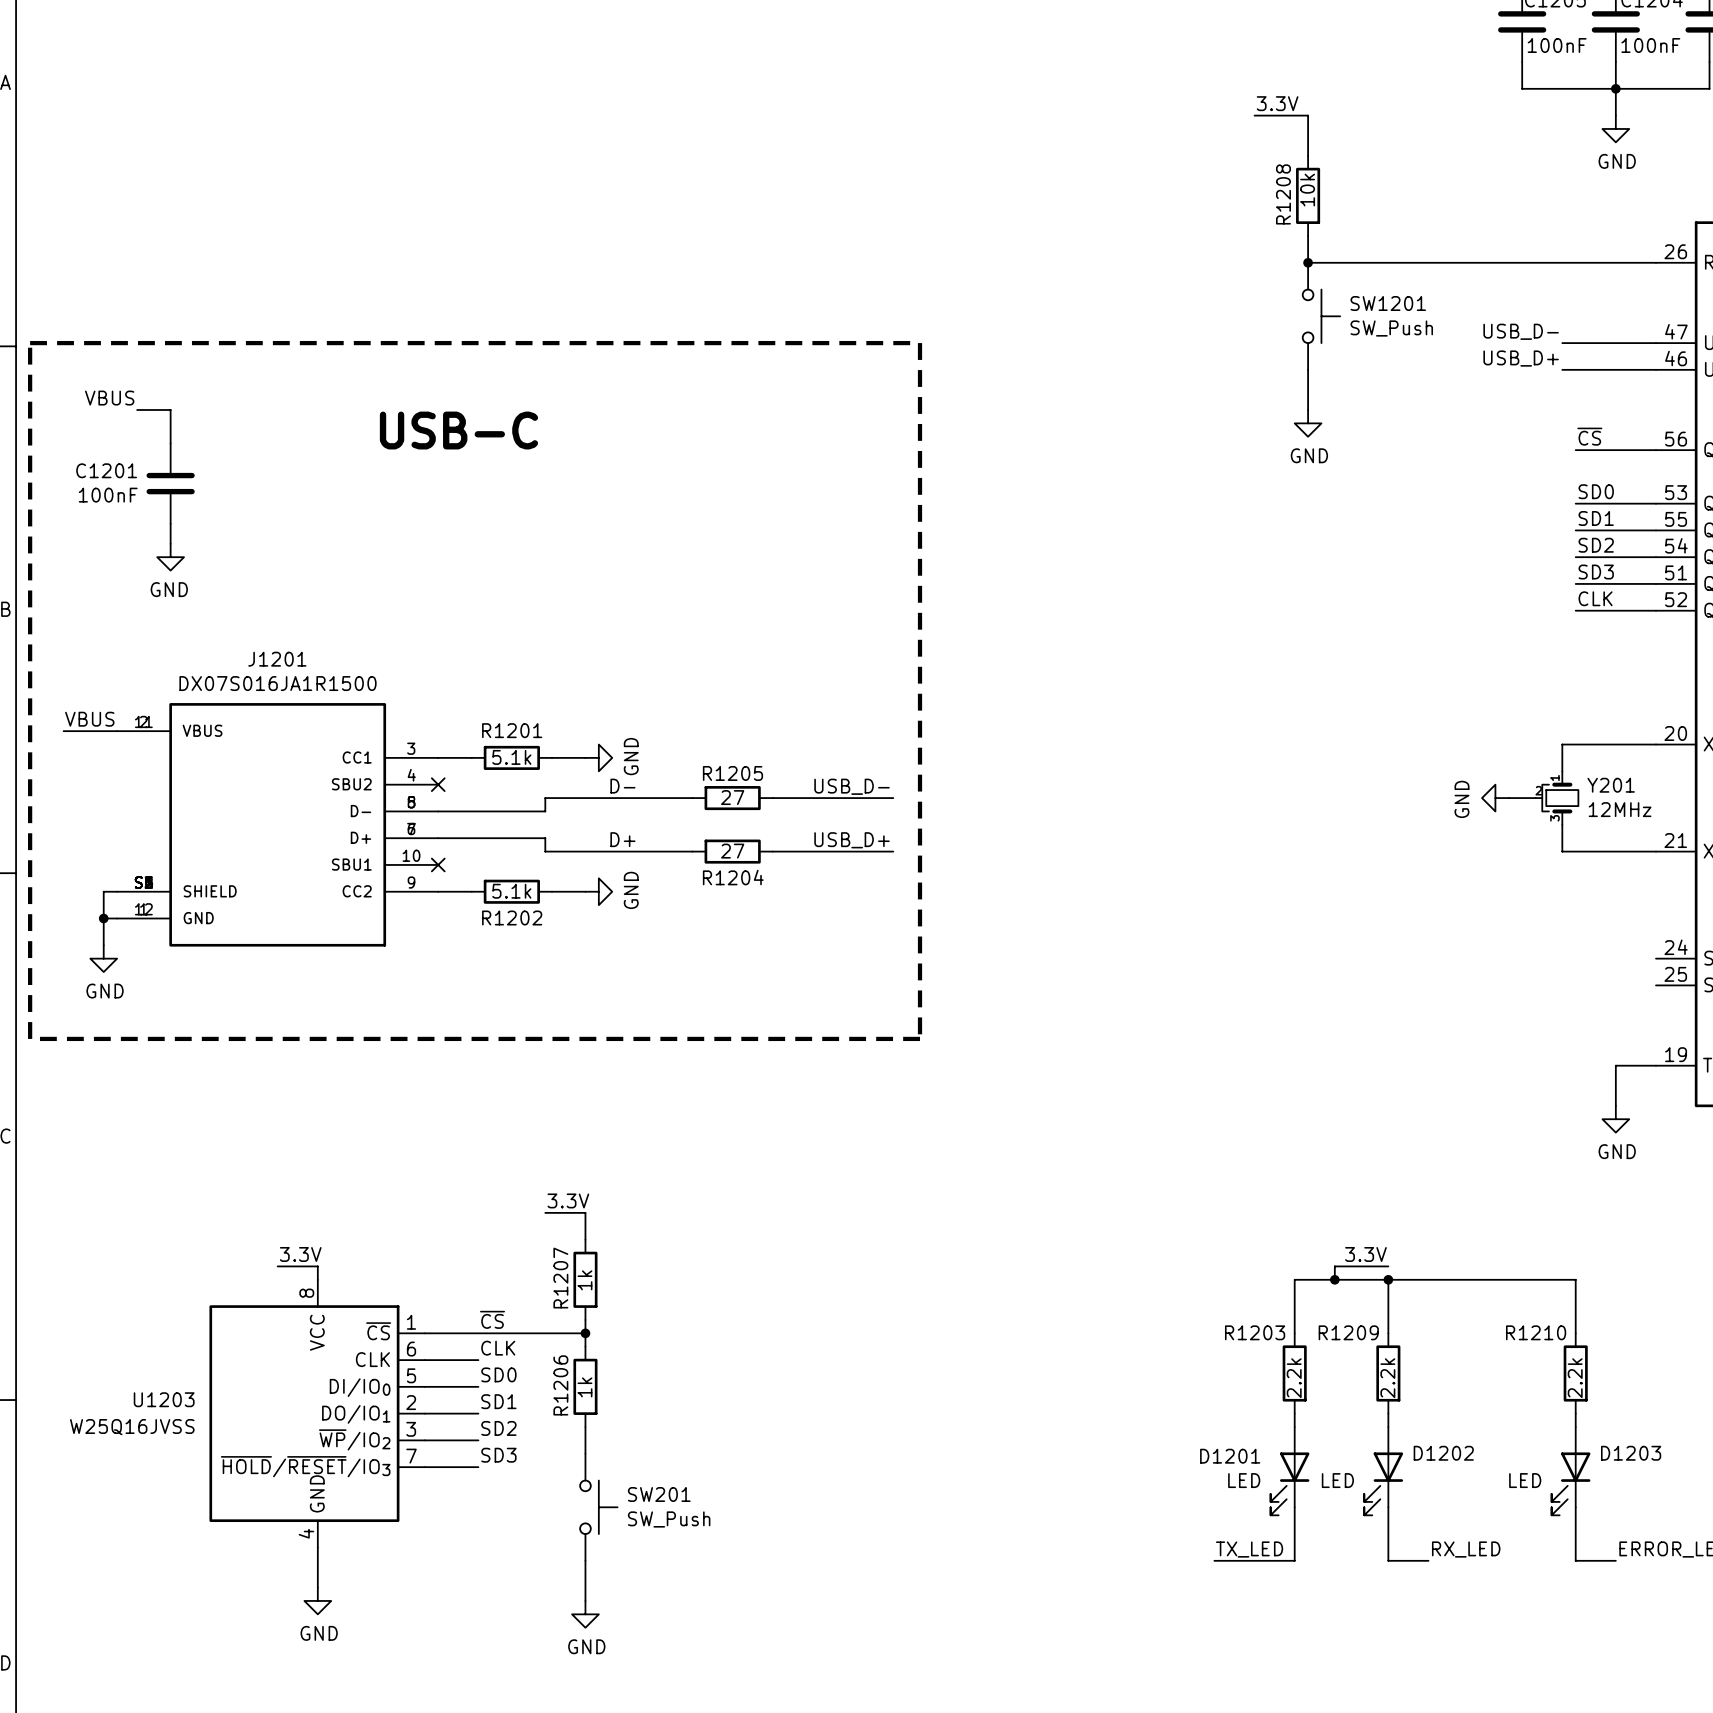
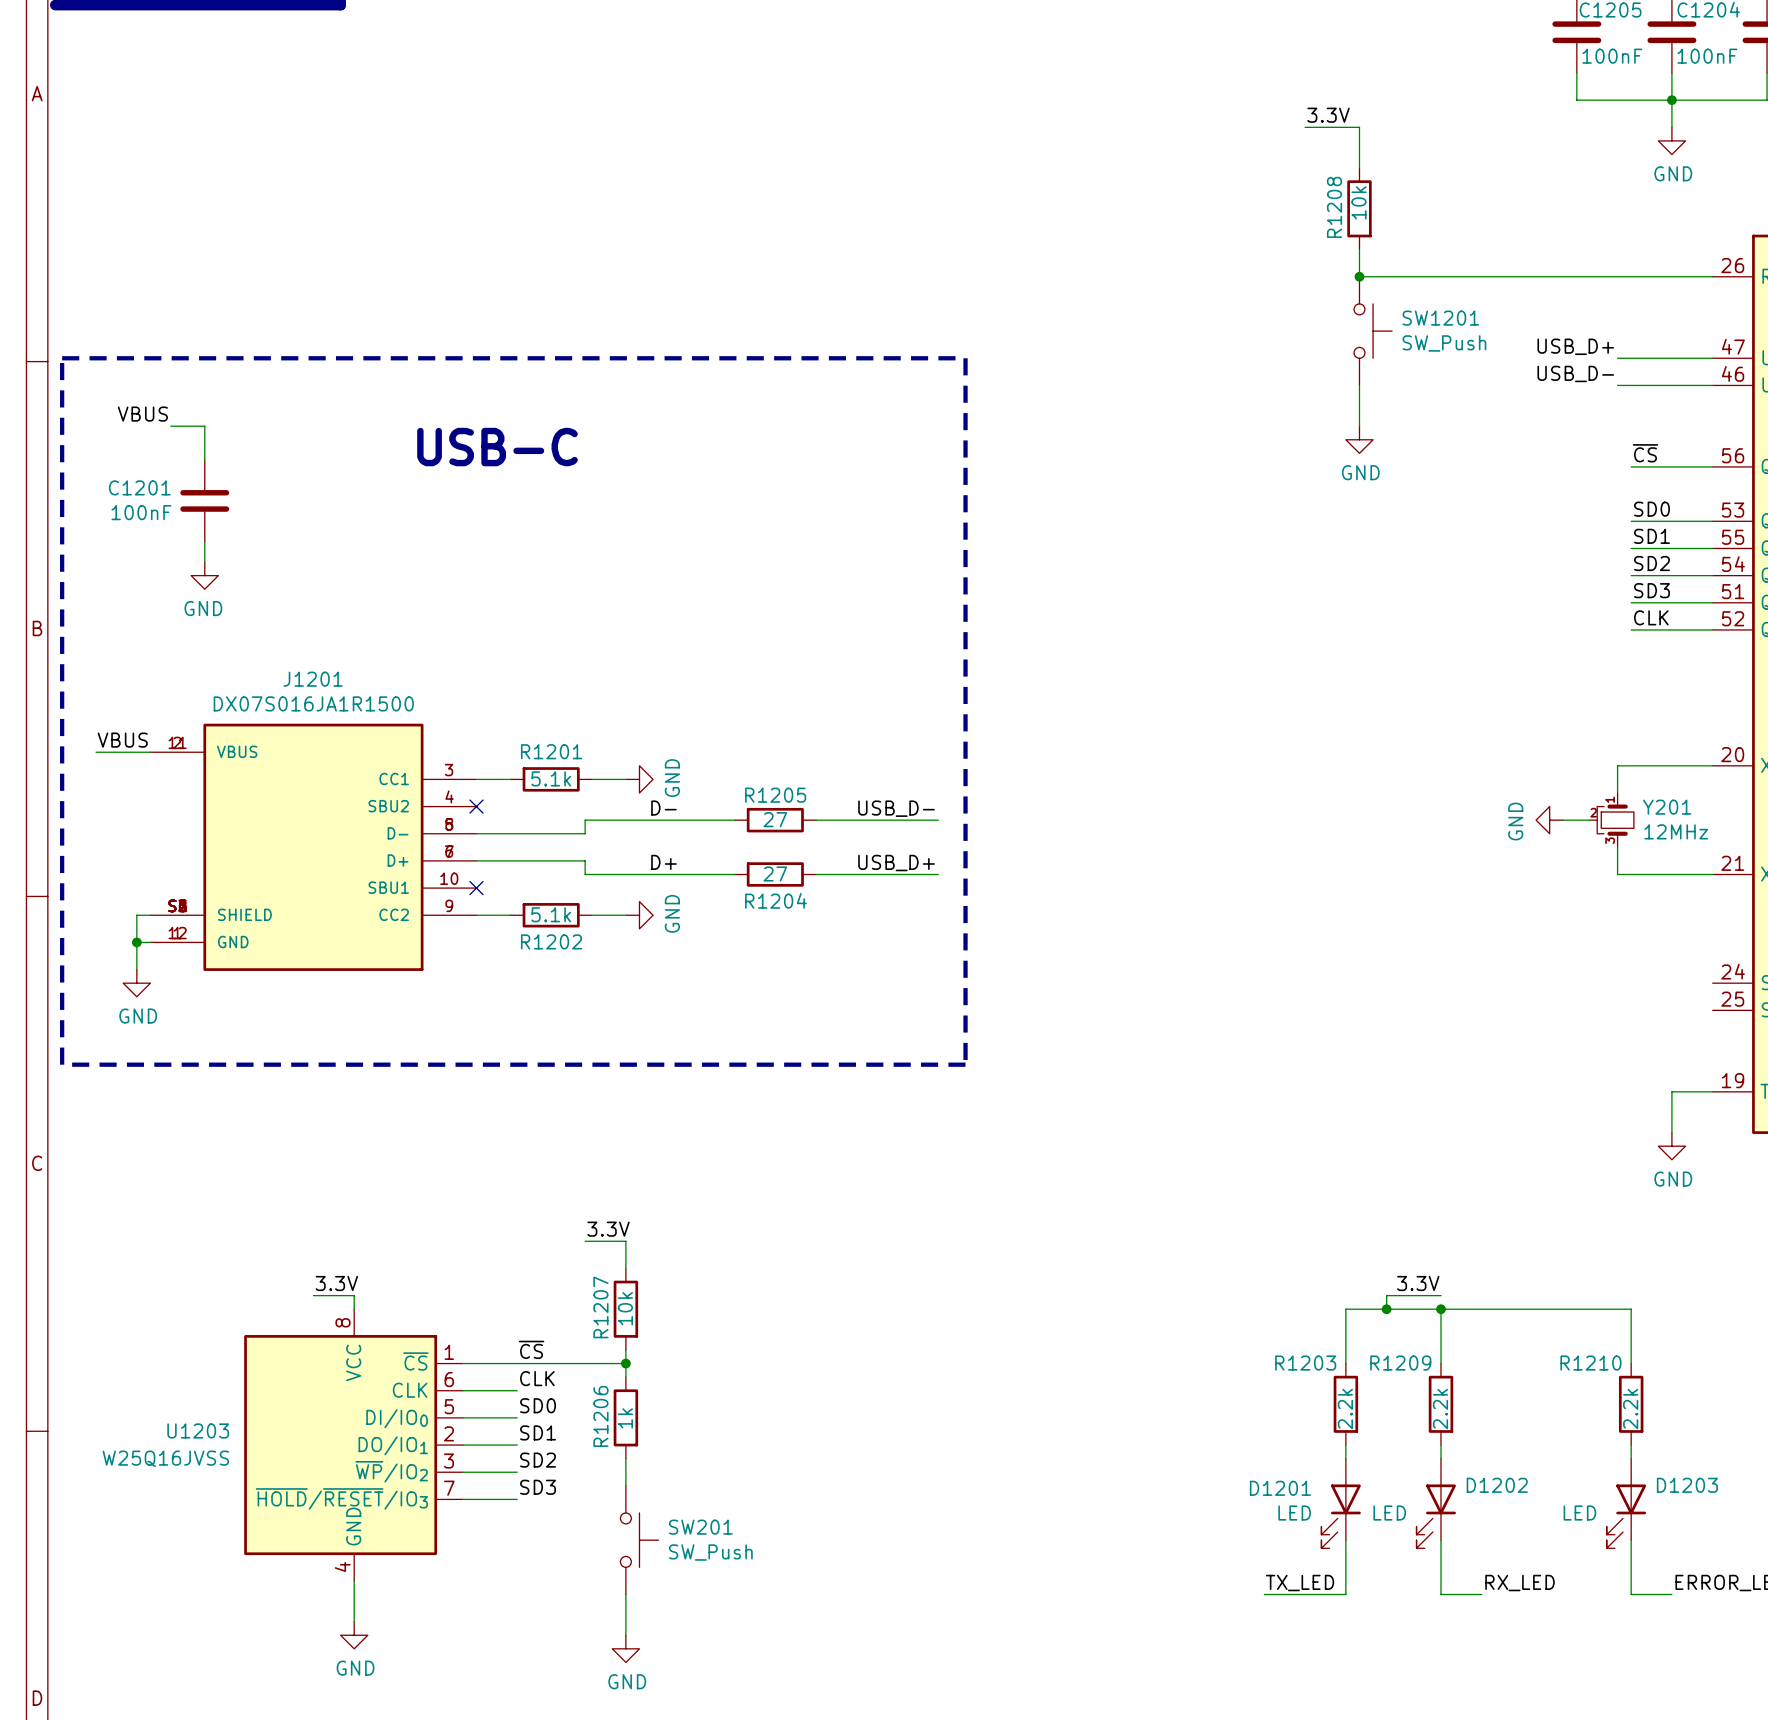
label: USB_D- (1521, 331) -> USB_D+ (1575, 346)
label: USB_D+ (1521, 358) -> USB_D- (1575, 373)
R1207 value: 1k (584, 1280) -> 10k (625, 1308)

